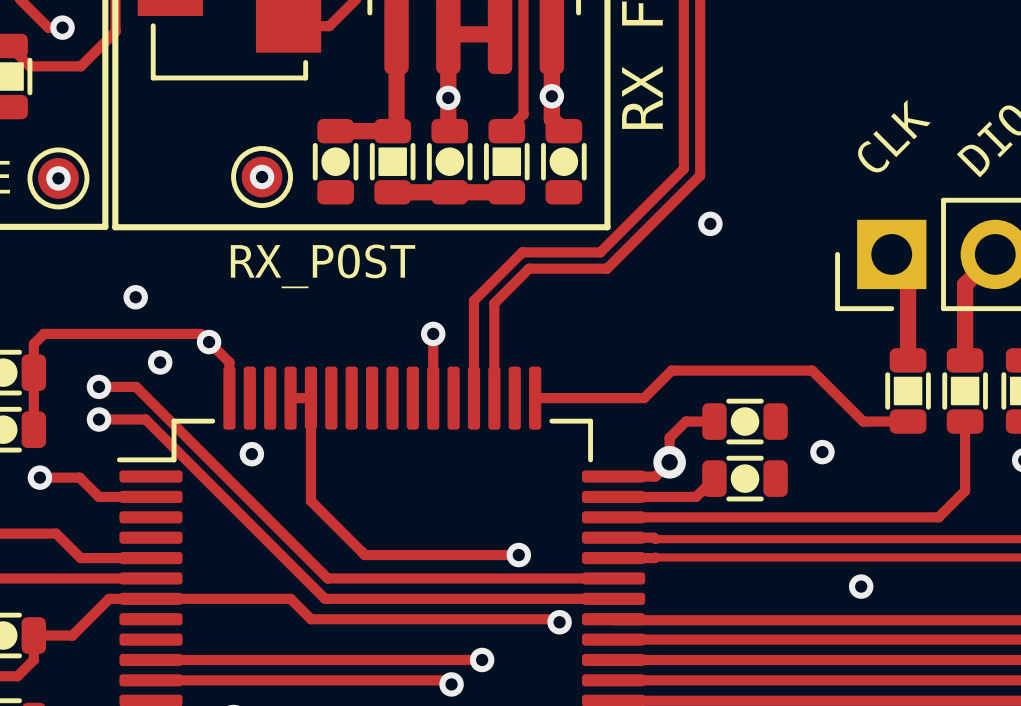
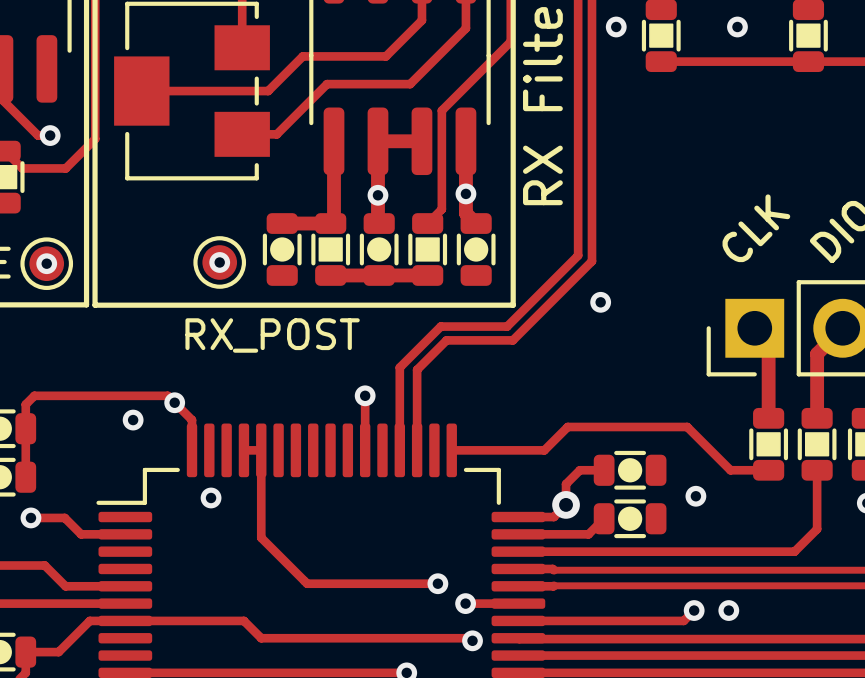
via: (135, 297) -> none
track: (99, 386) (136, 386) (327, 578) (551, 578) -> none
via: (99, 386) -> none
track: (99, 419) (145, 419) (325, 598) (613, 598) -> (694, 610) (683, 620) (518, 620)
via: (99, 419) -> none
via: none -> (465, 603)
via: none -> (694, 610)

